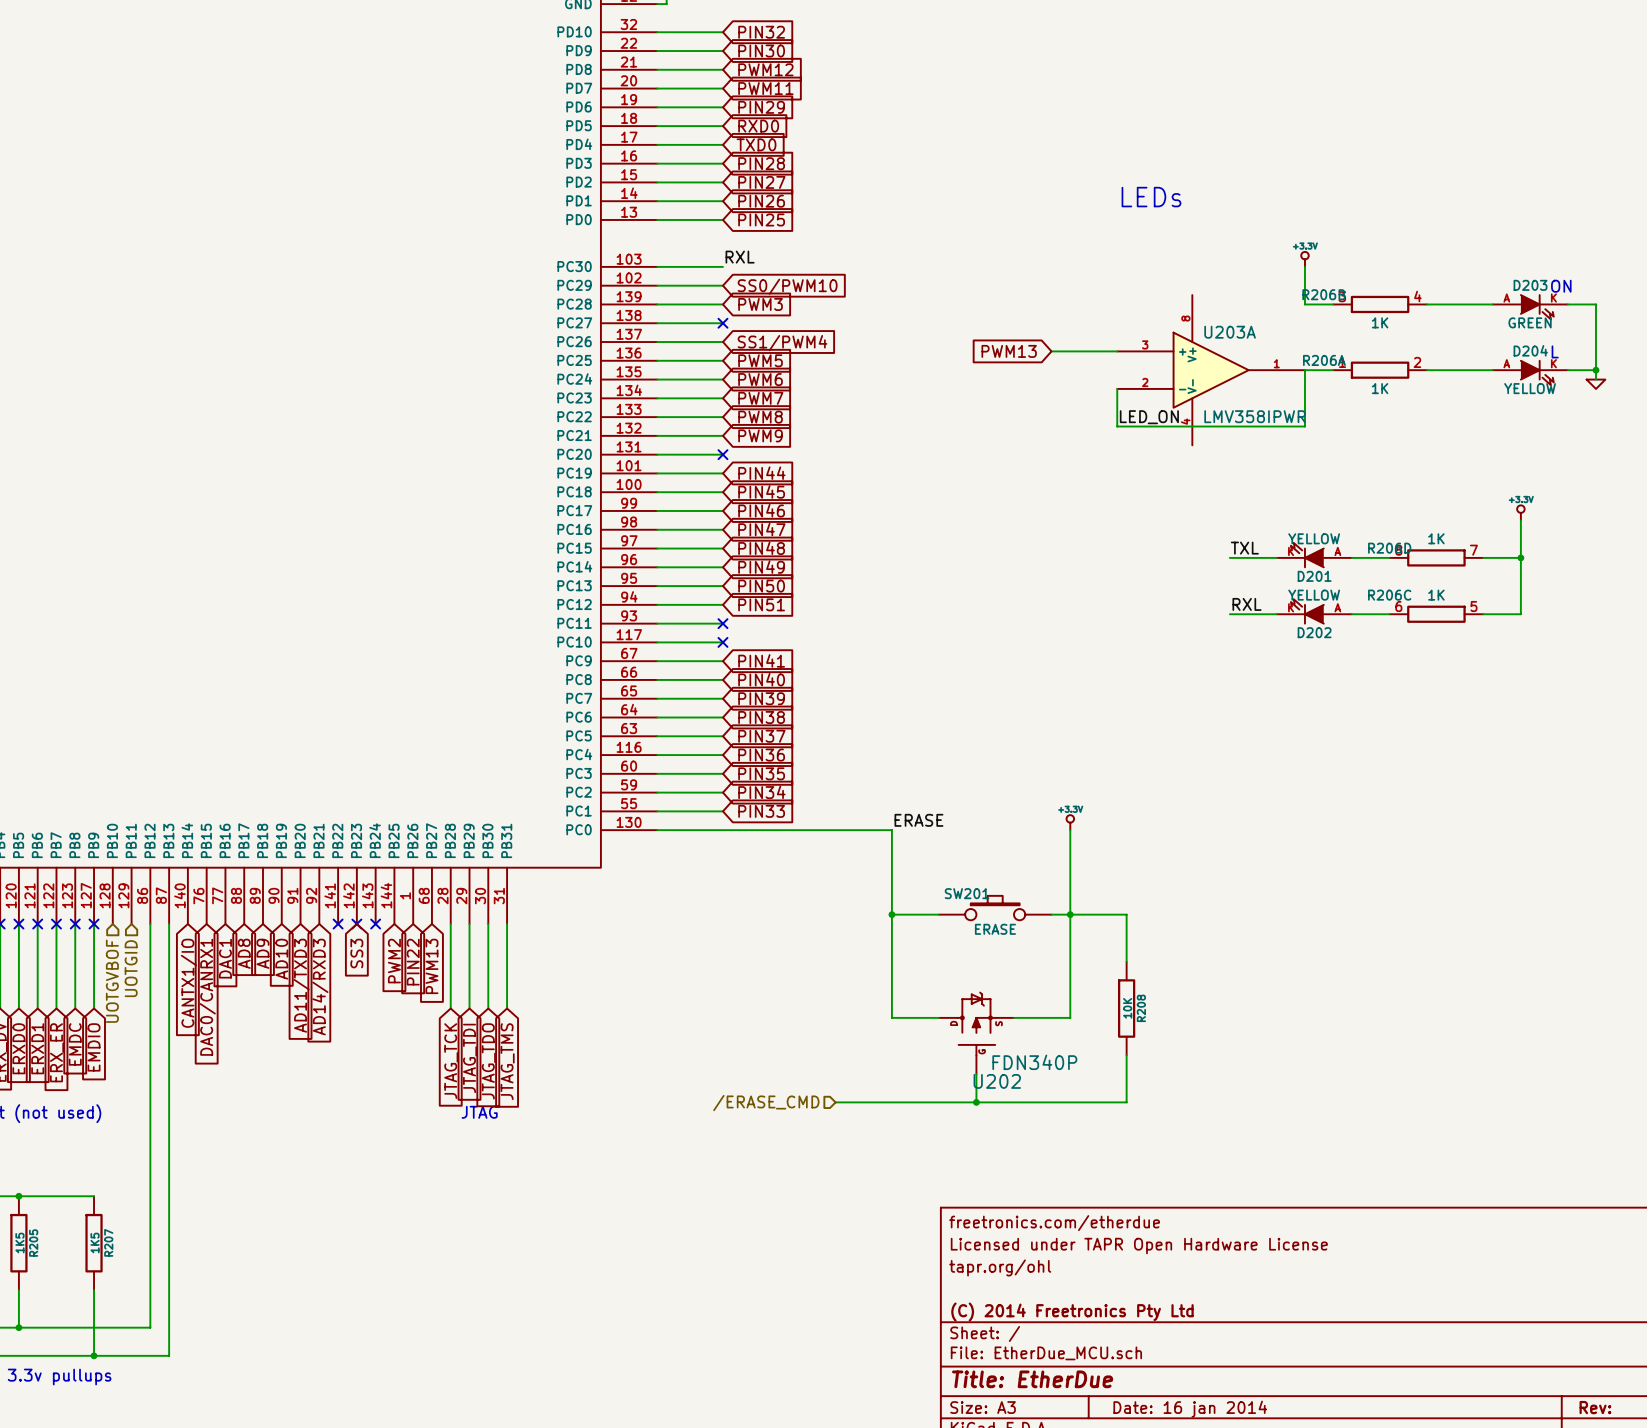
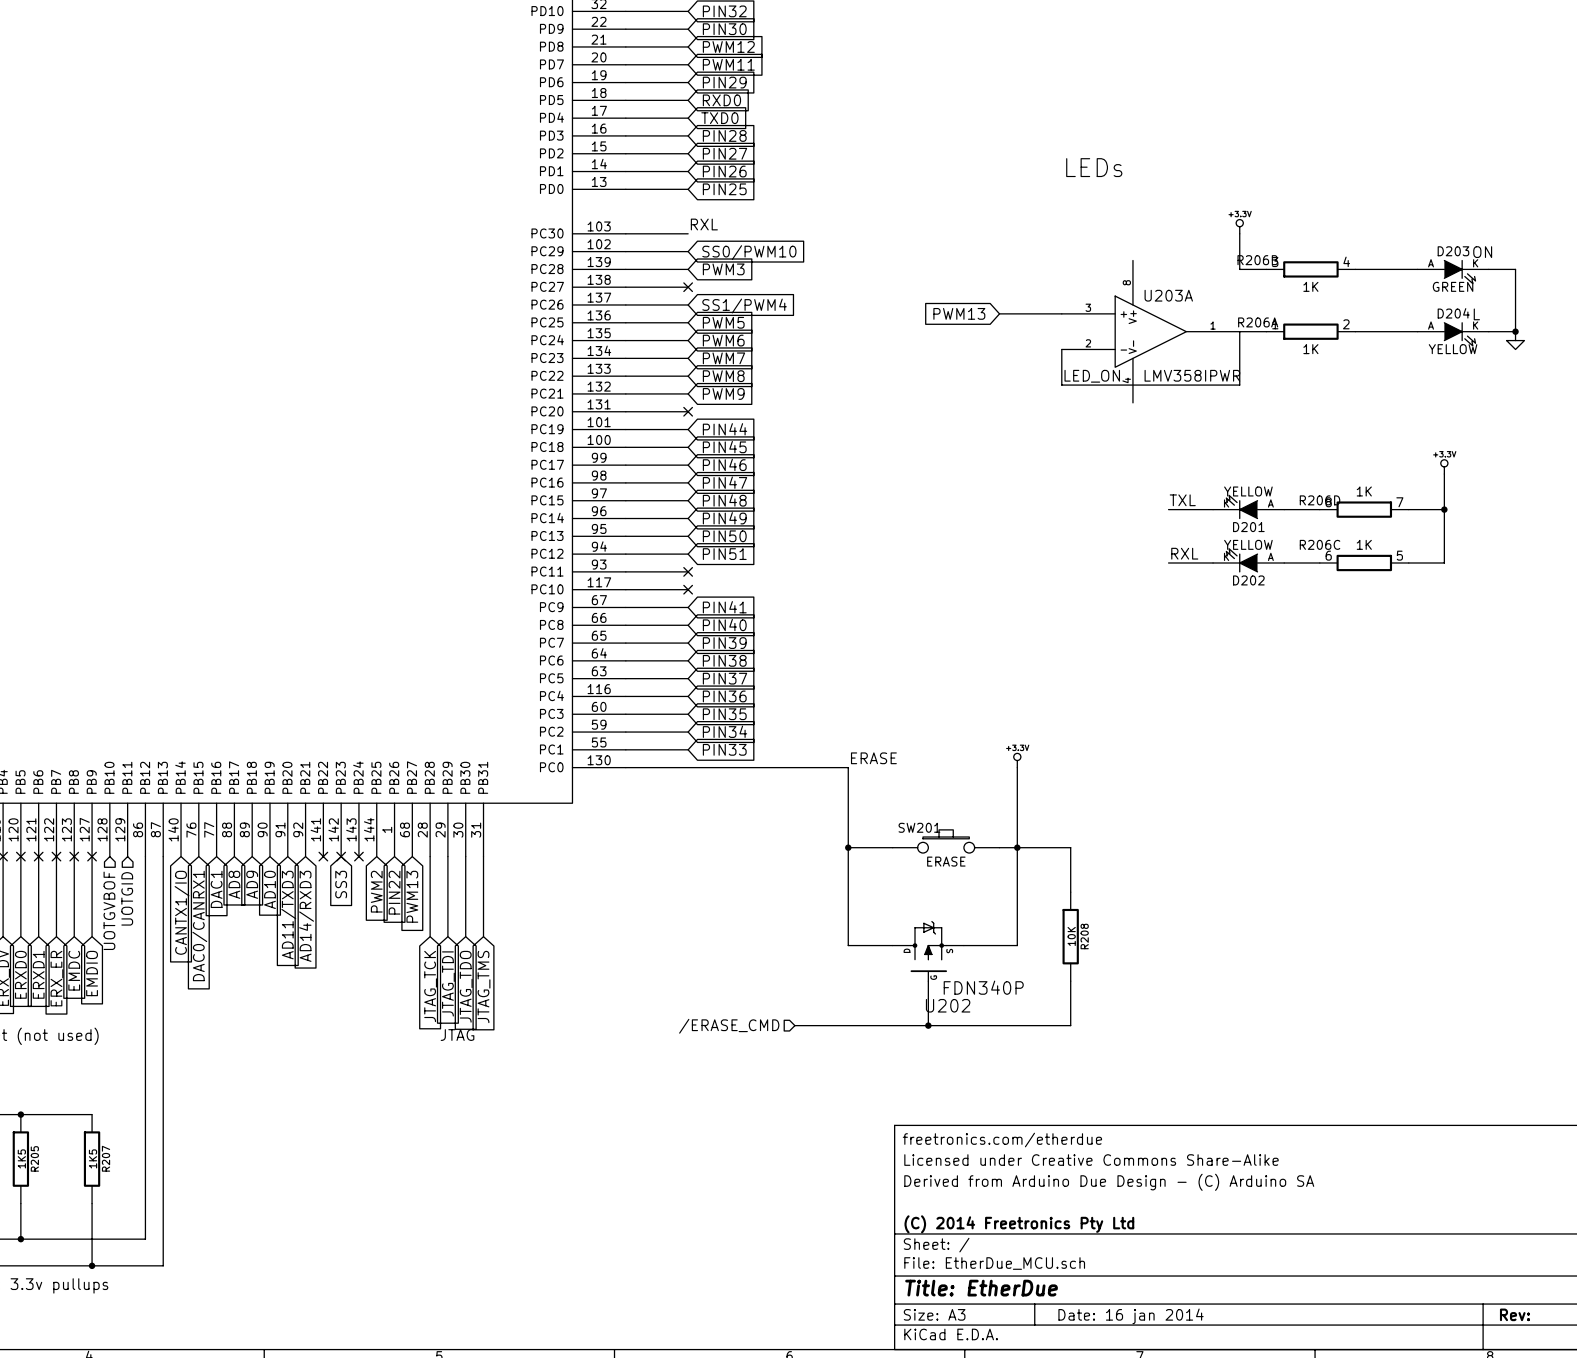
title block: Licensed under TAPR Open Hardware License (1139, 1246) -> Licensed under Creative Commons Share-Alike (1091, 1160)
title block: tapr.org/ohl (1000, 1267) -> Derived from Arduino Due Design - (C) Arduino SA (1109, 1182)

